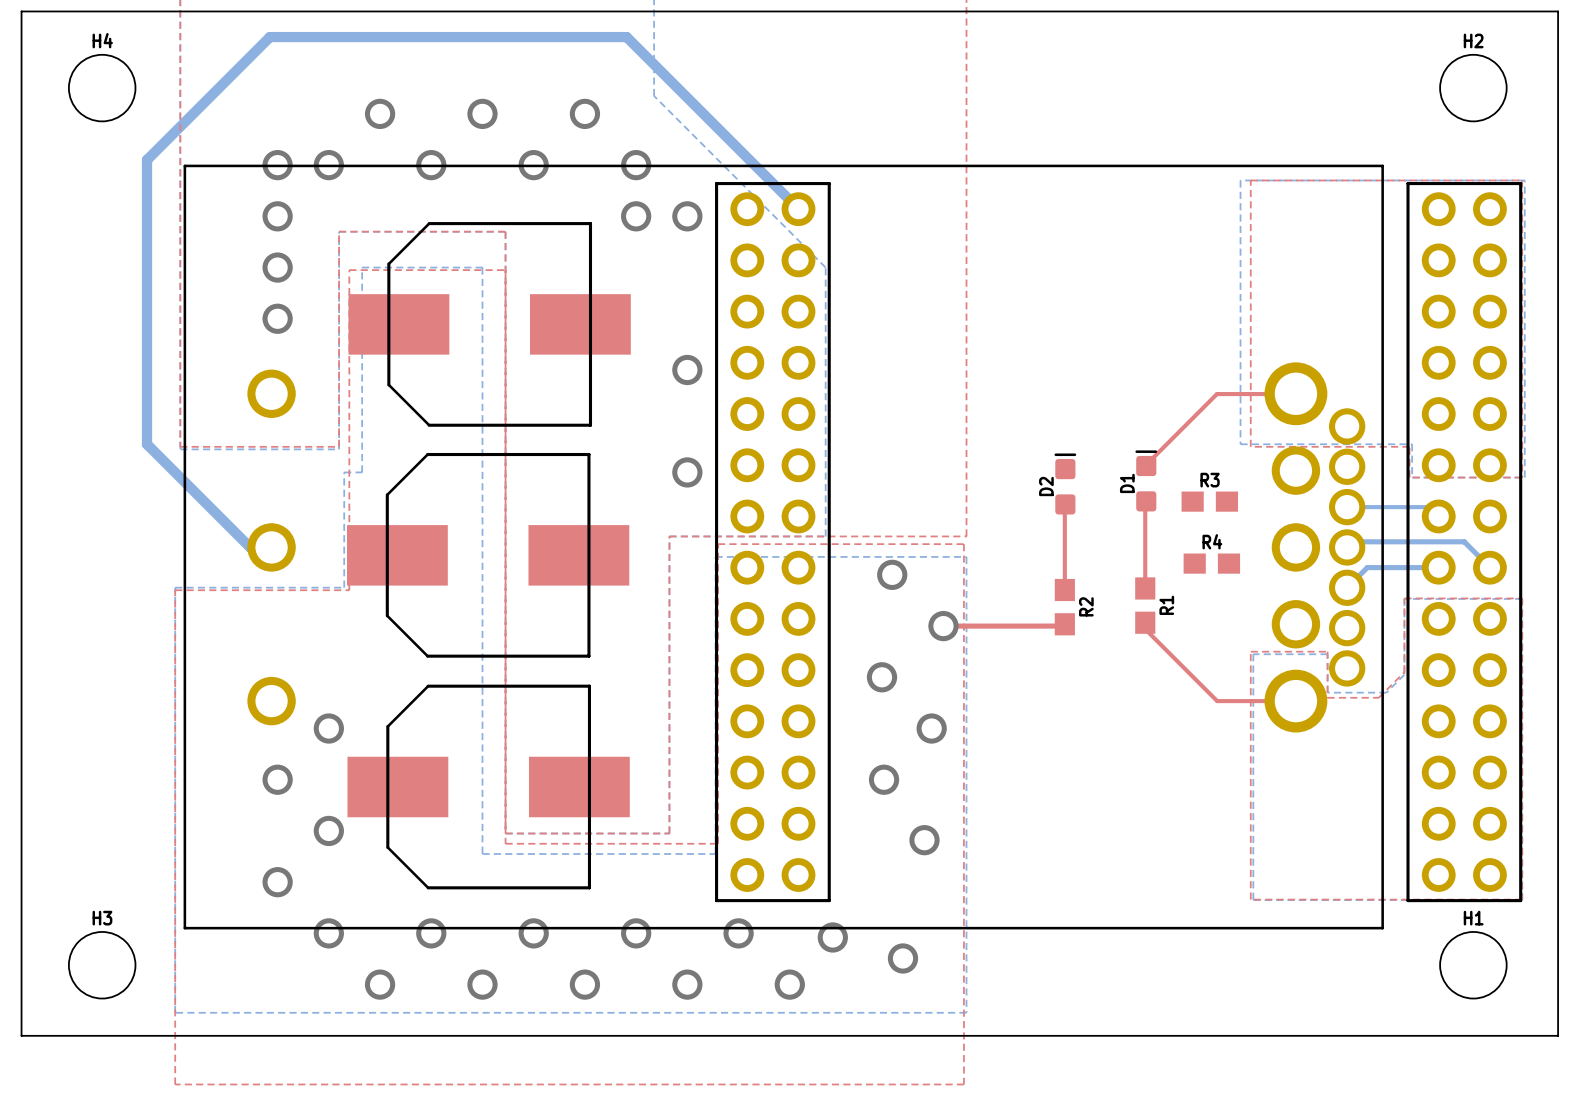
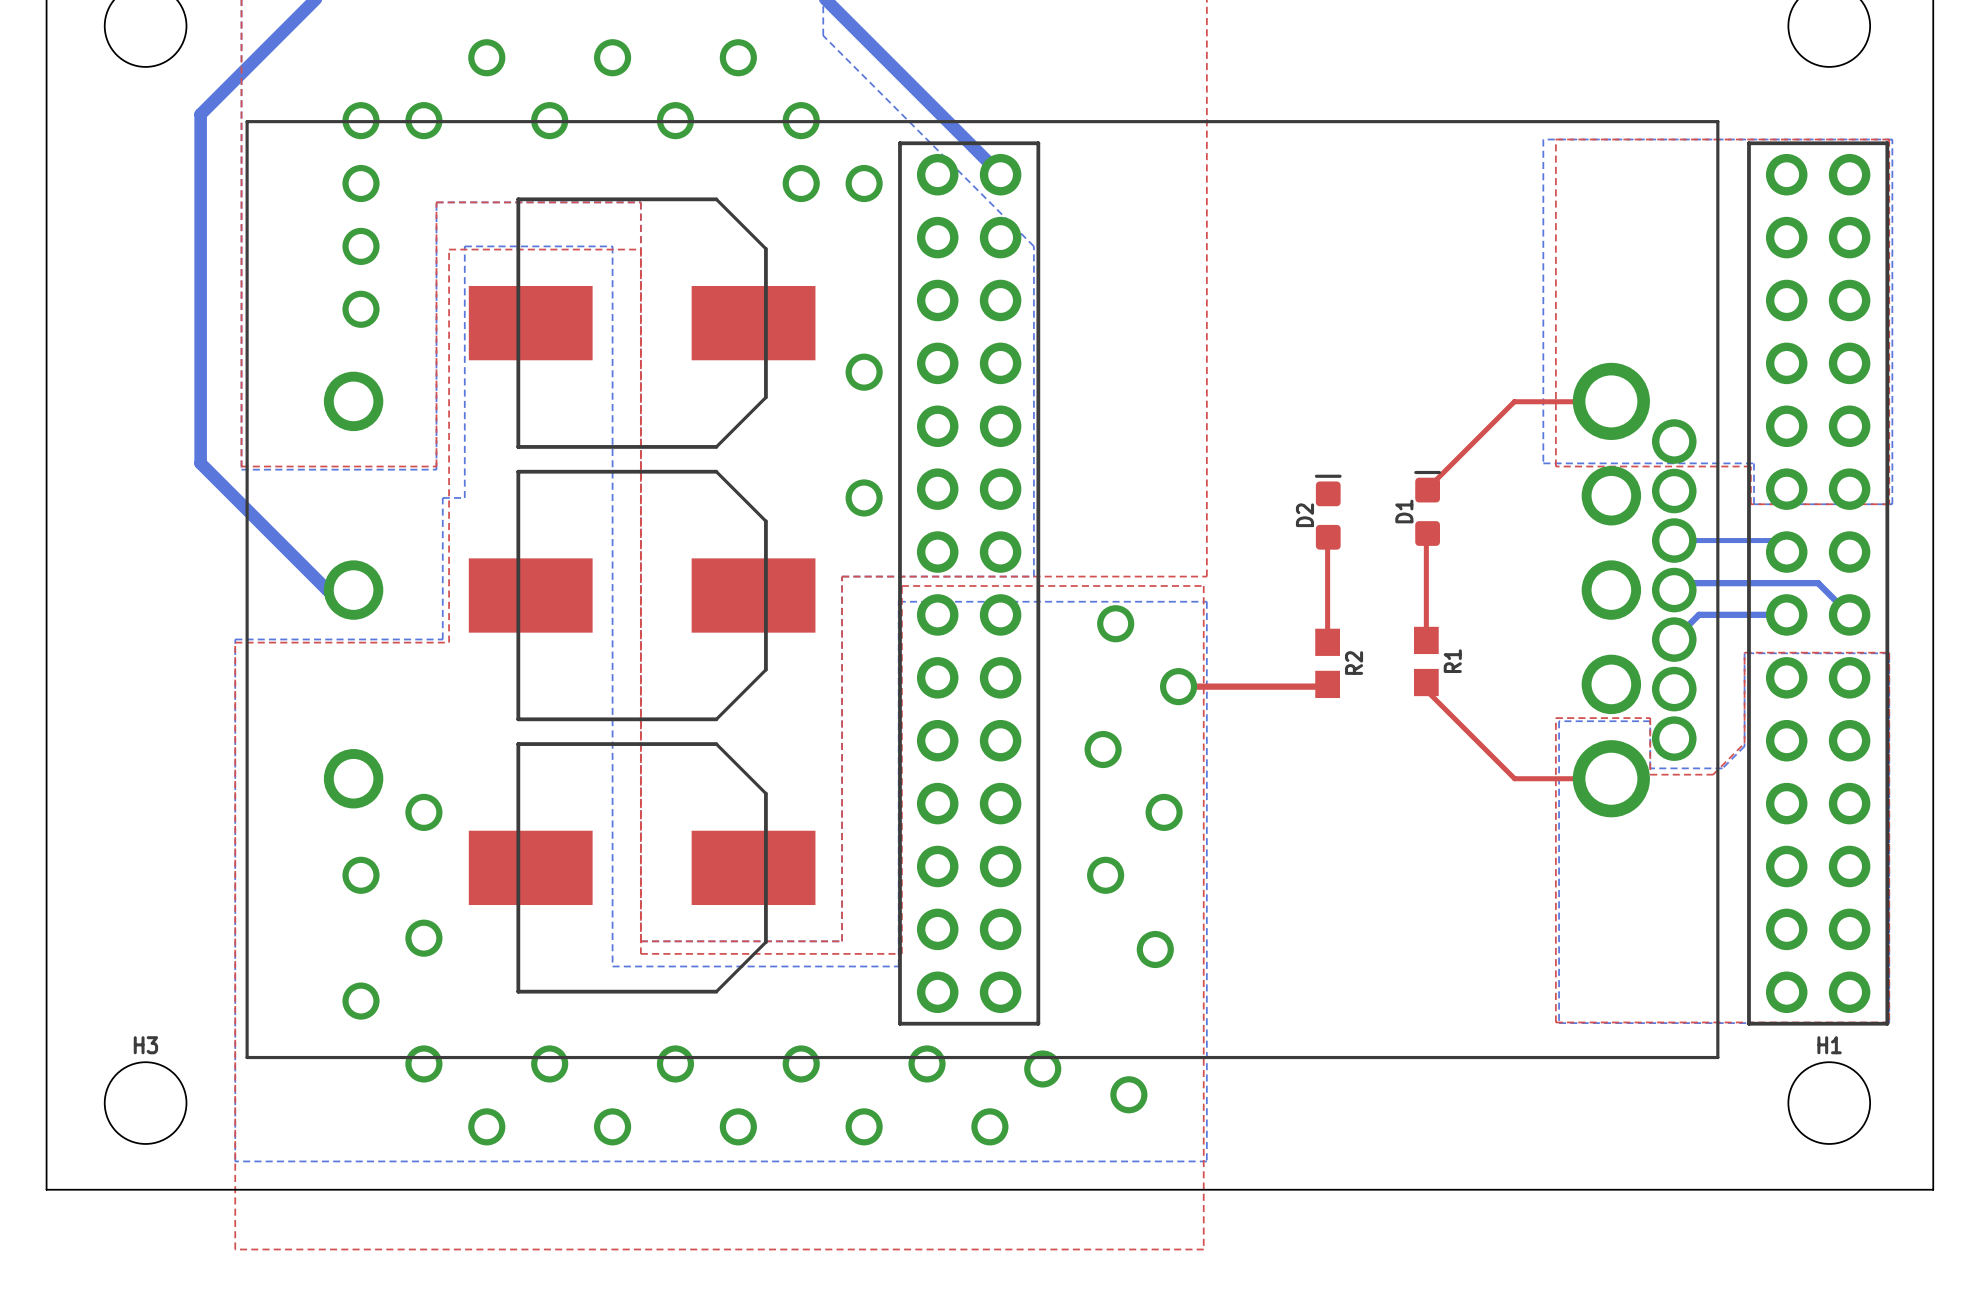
part rotation: 0° (489, 324) -> 180° (642, 323)
R3: (1209, 501) -> none
part rotation: 0° (488, 555) -> 180° (642, 595)
R4: (1211, 563) -> none
part rotation: 0° (488, 787) -> 180° (642, 867)

